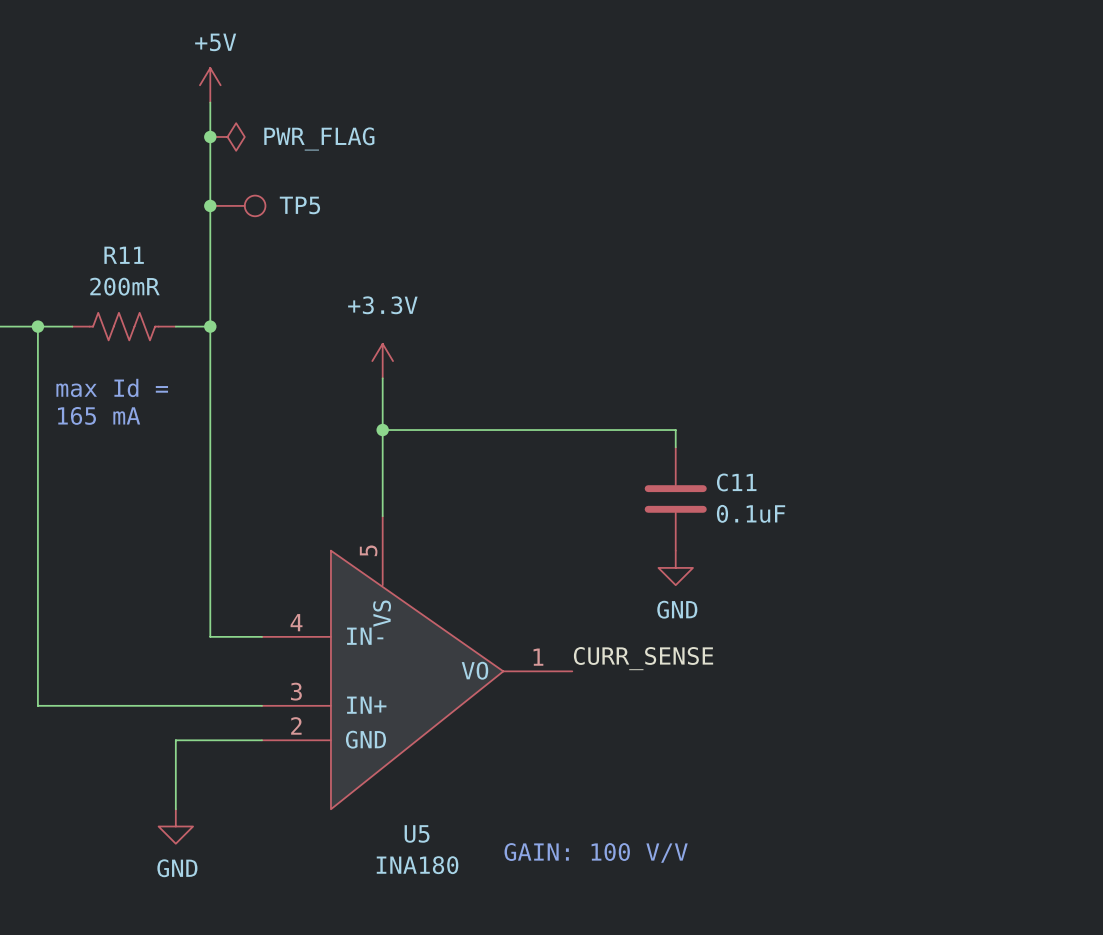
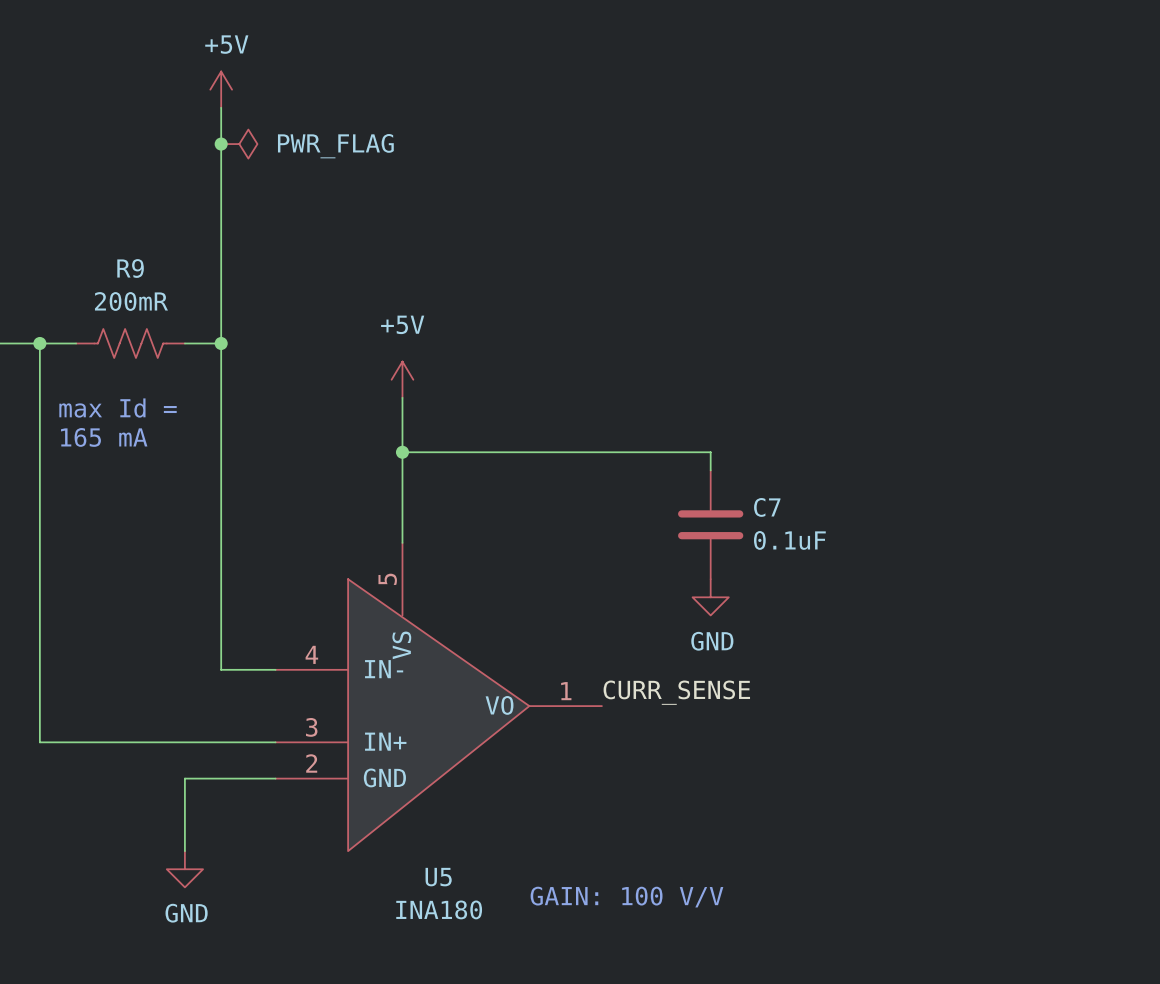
junction: (210, 205) -> none
TP5: (237, 205) -> none
R11 name: R11 (124, 255) -> R9 (130, 268)
power symbol: +3.3V (382, 361) -> +5V (402, 379)
C11 name: C11 (736, 482) -> C7 (767, 507)

